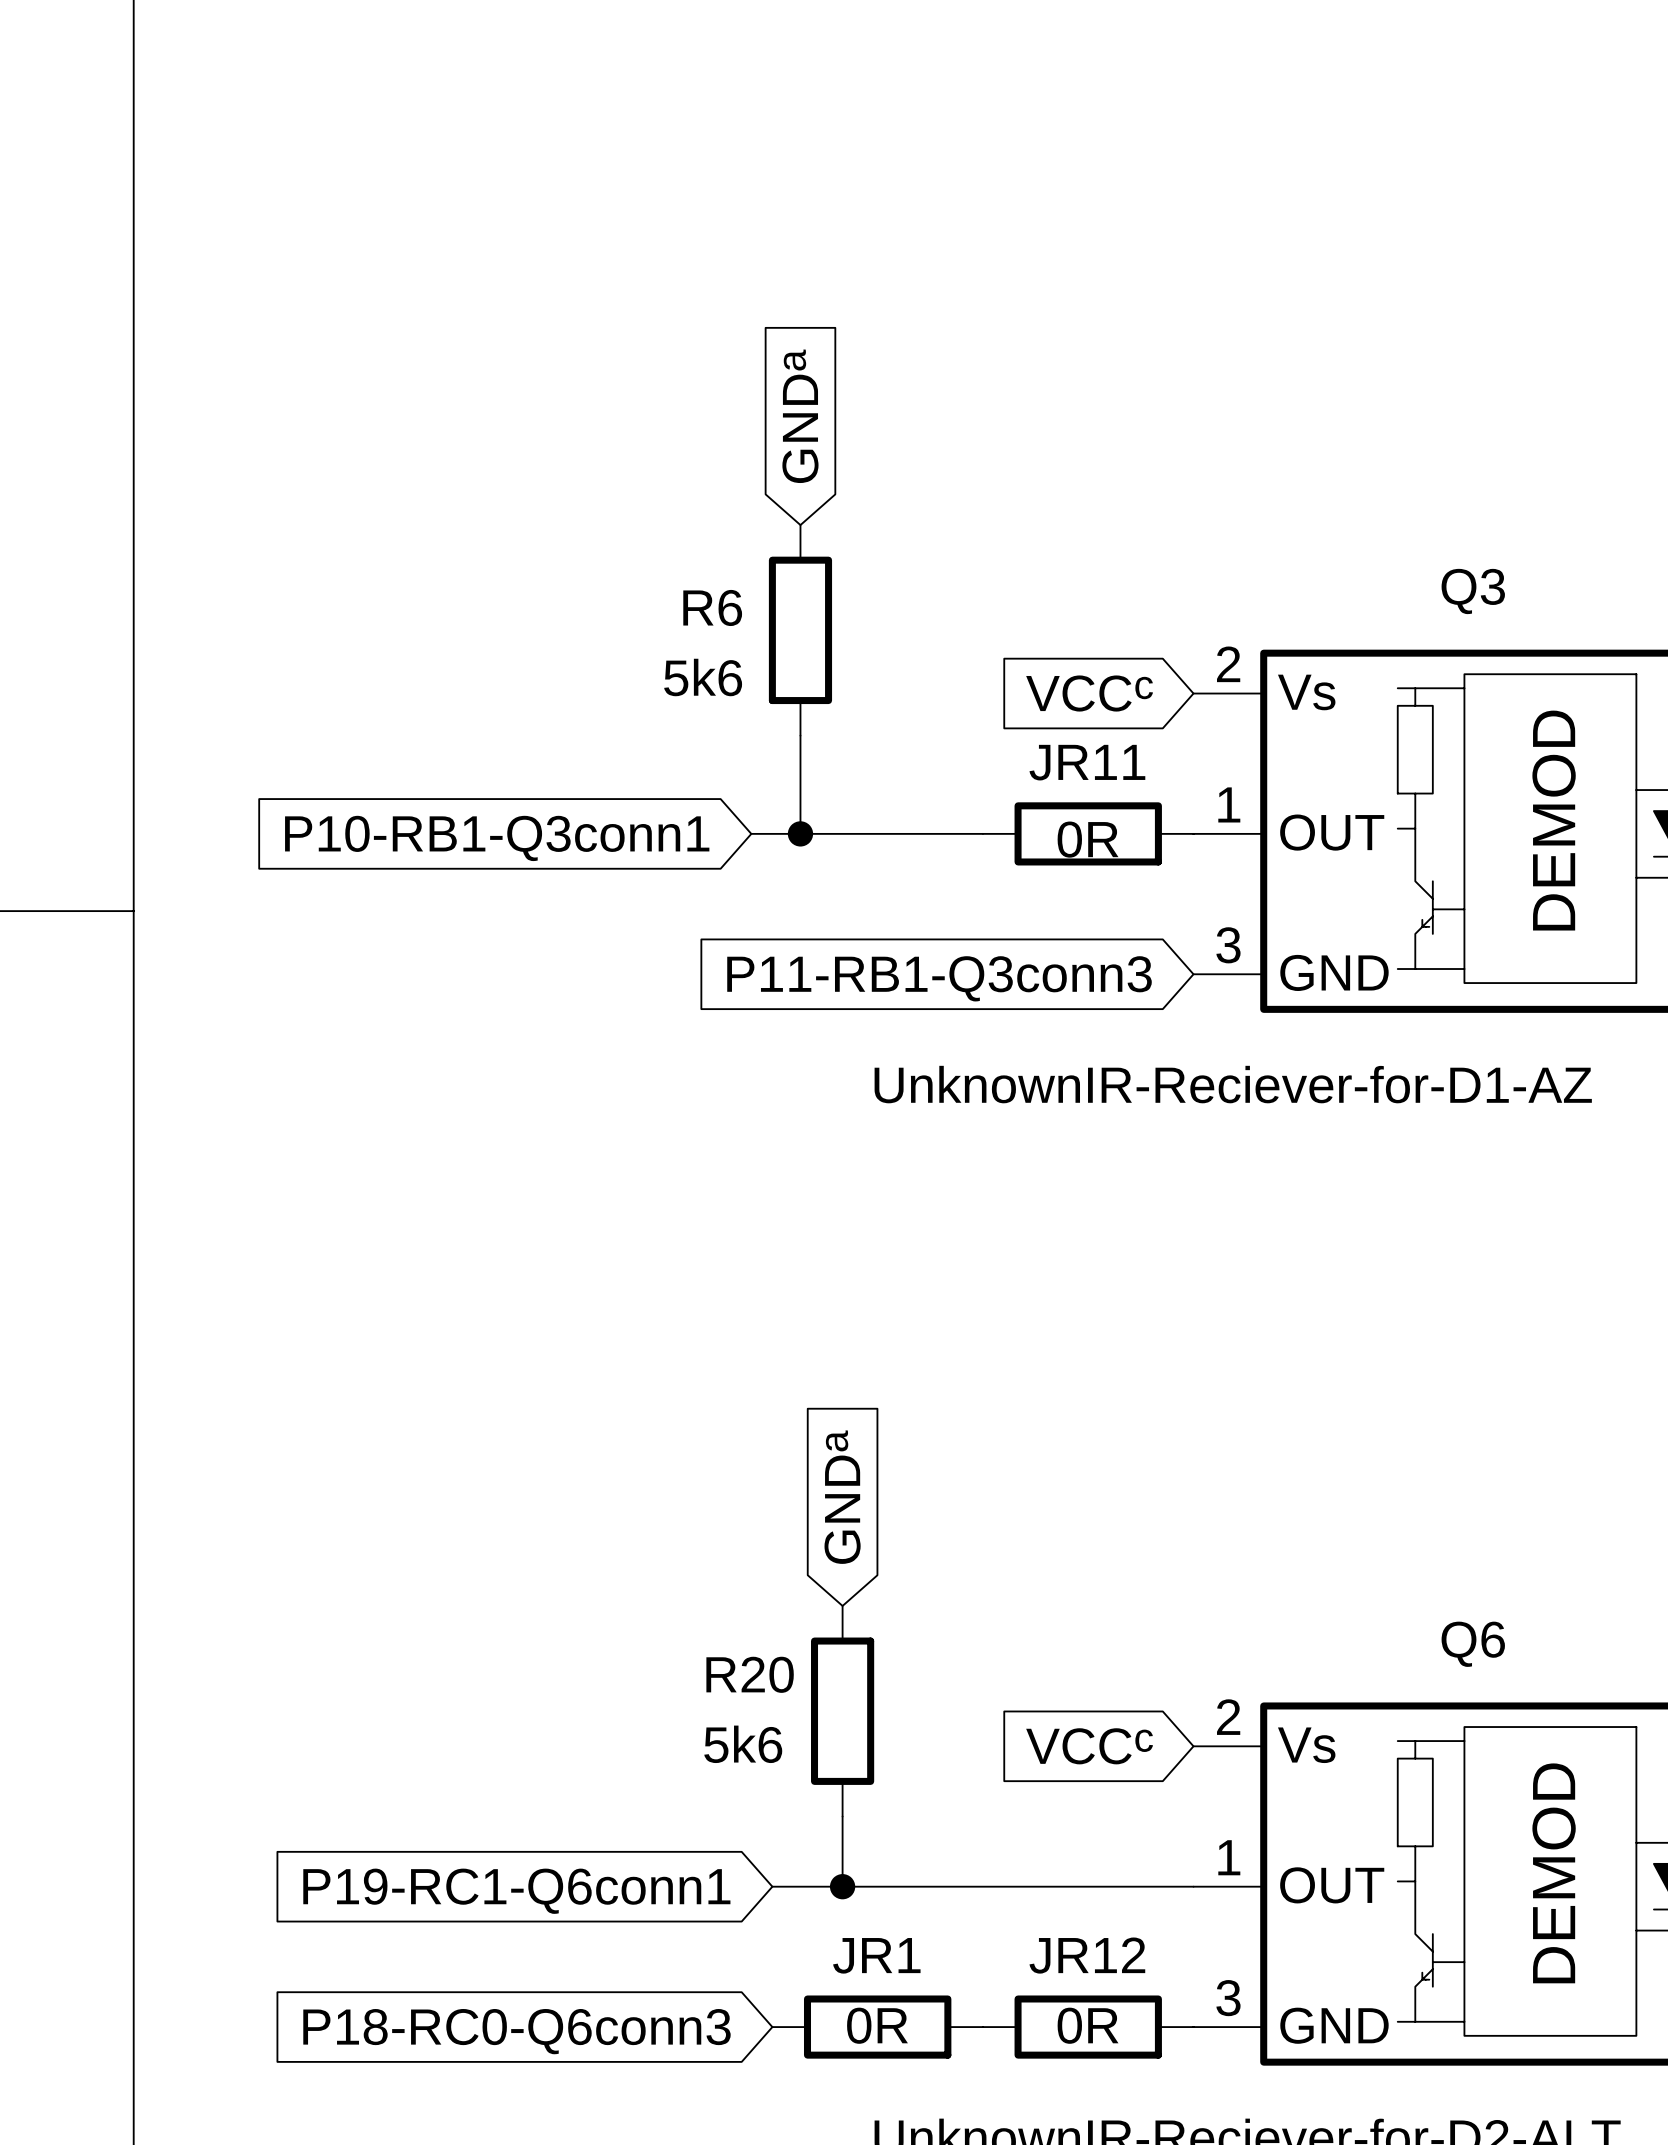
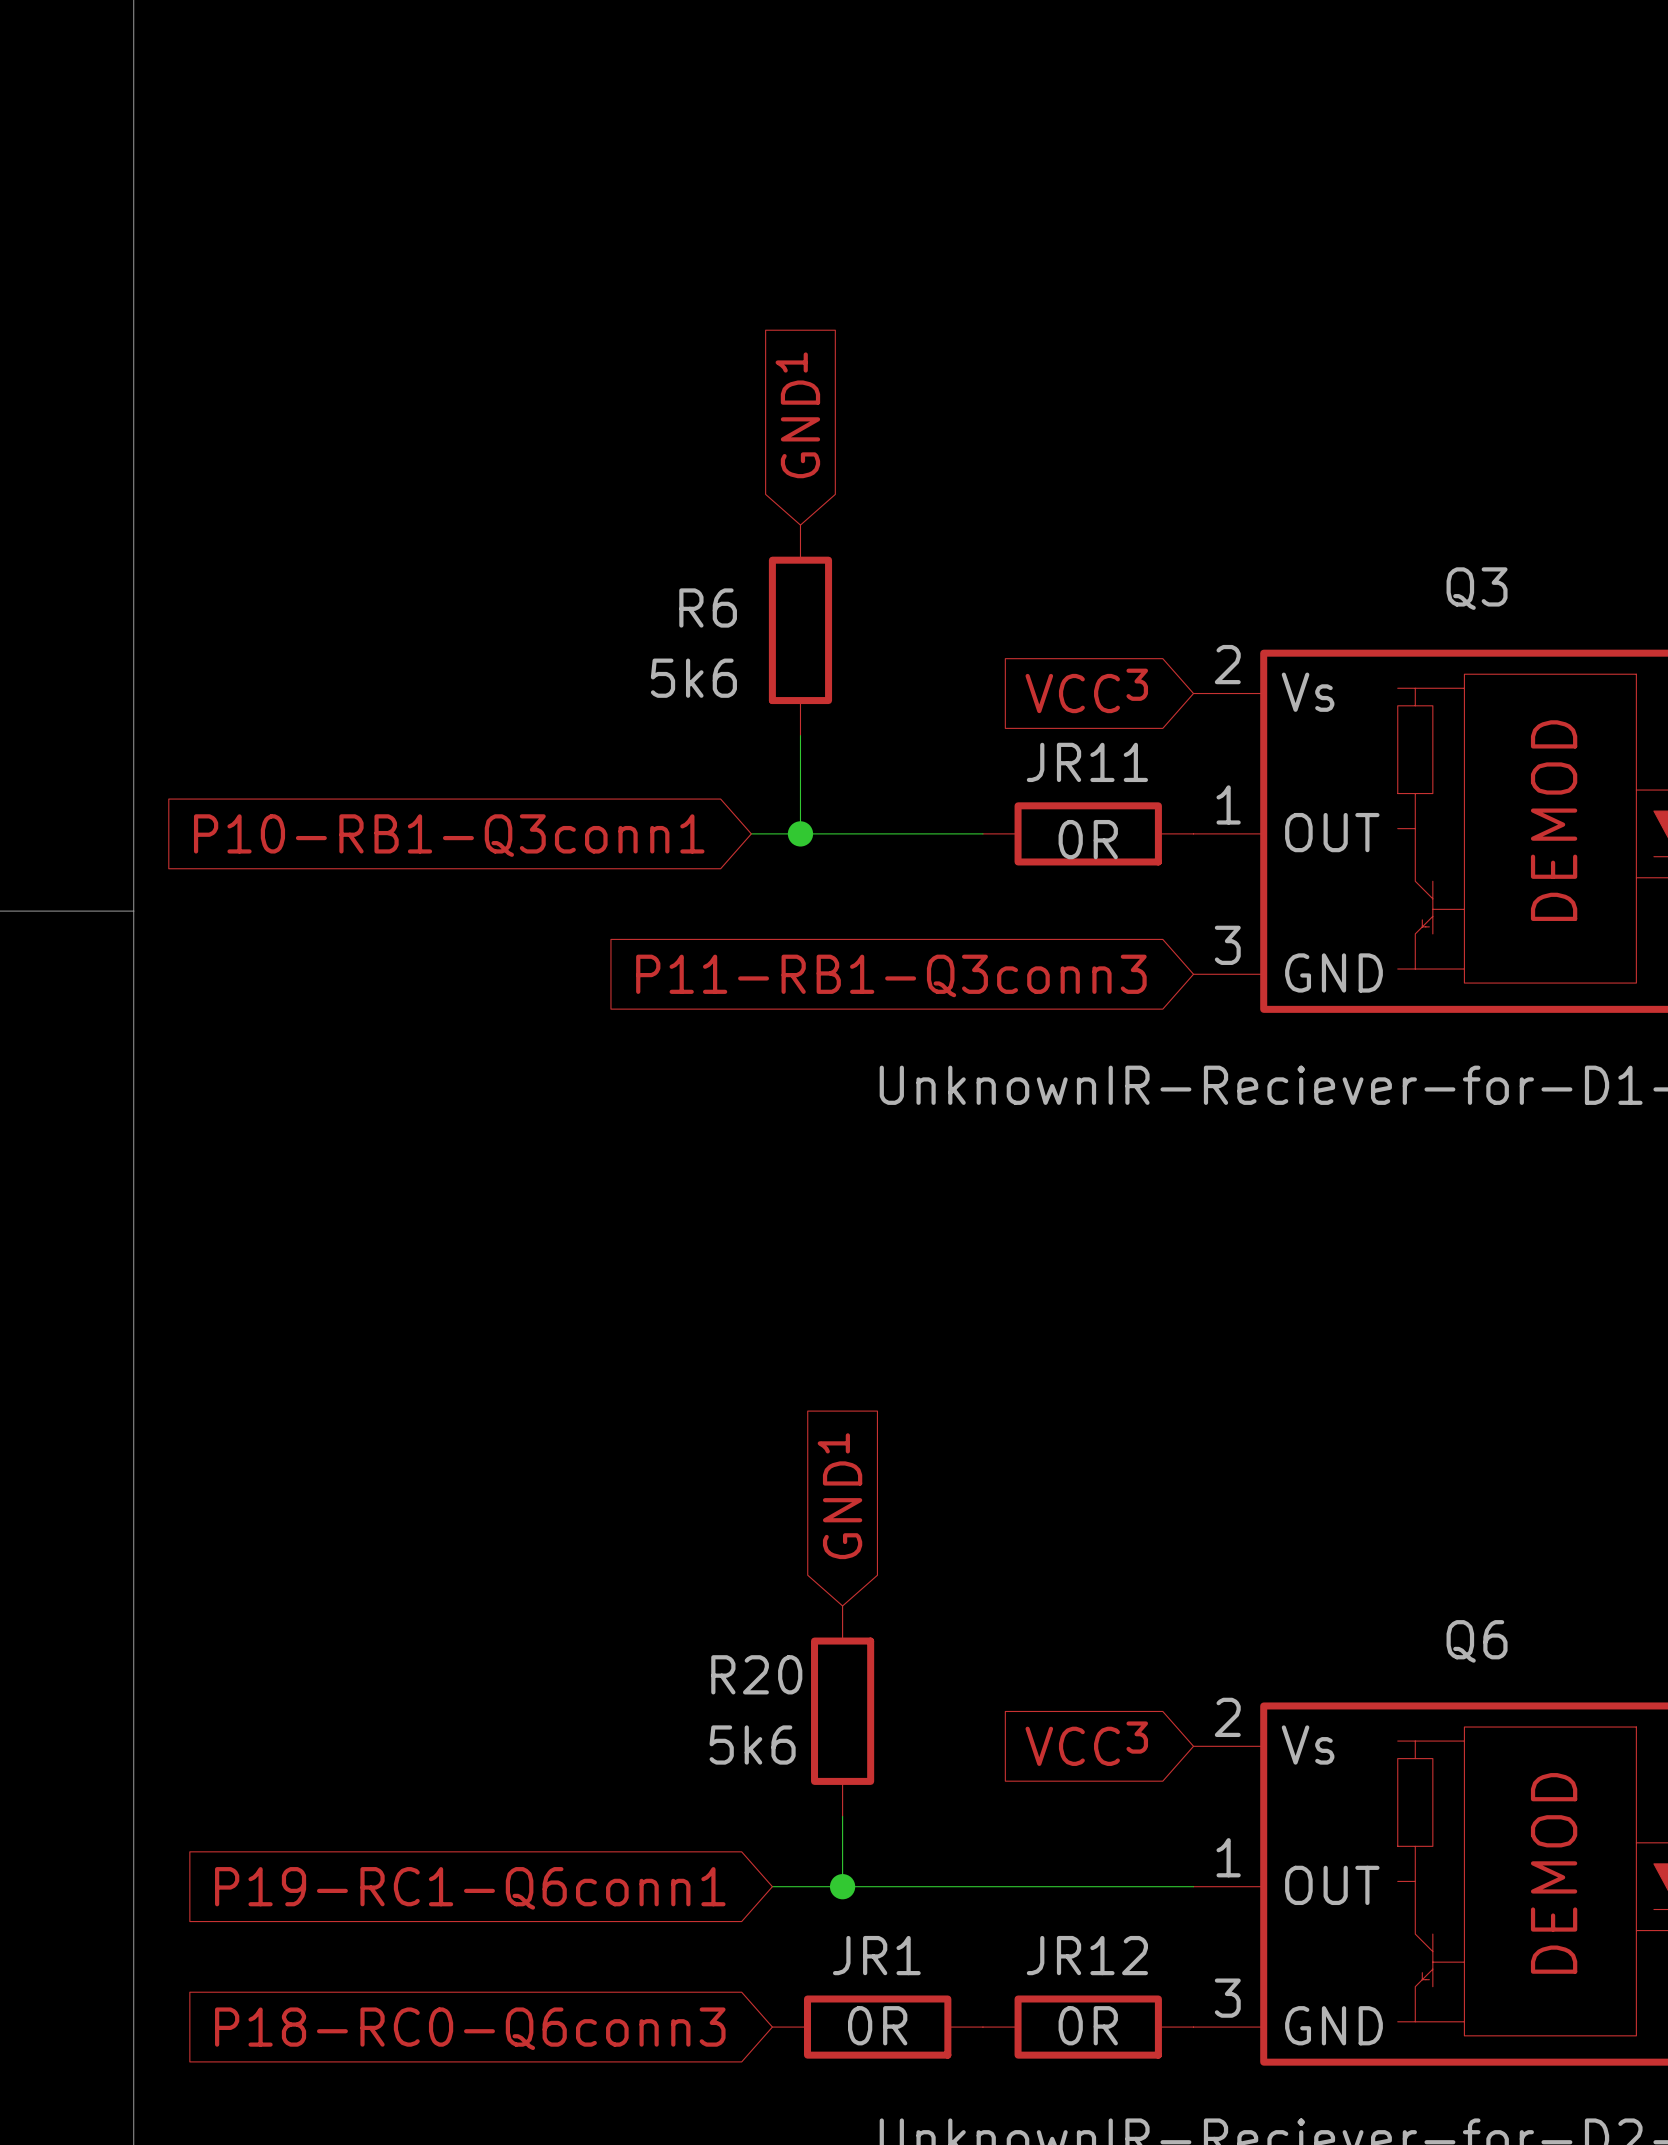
global label: GNDa (800, 416) -> GND1 (797, 415)
global label: VCCc (1089, 693) -> VCC3 (1086, 690)
global label: GNDa (842, 1497) -> GND1 (839, 1496)
global label: VCCc (1089, 1746) -> VCC3 (1086, 1743)

